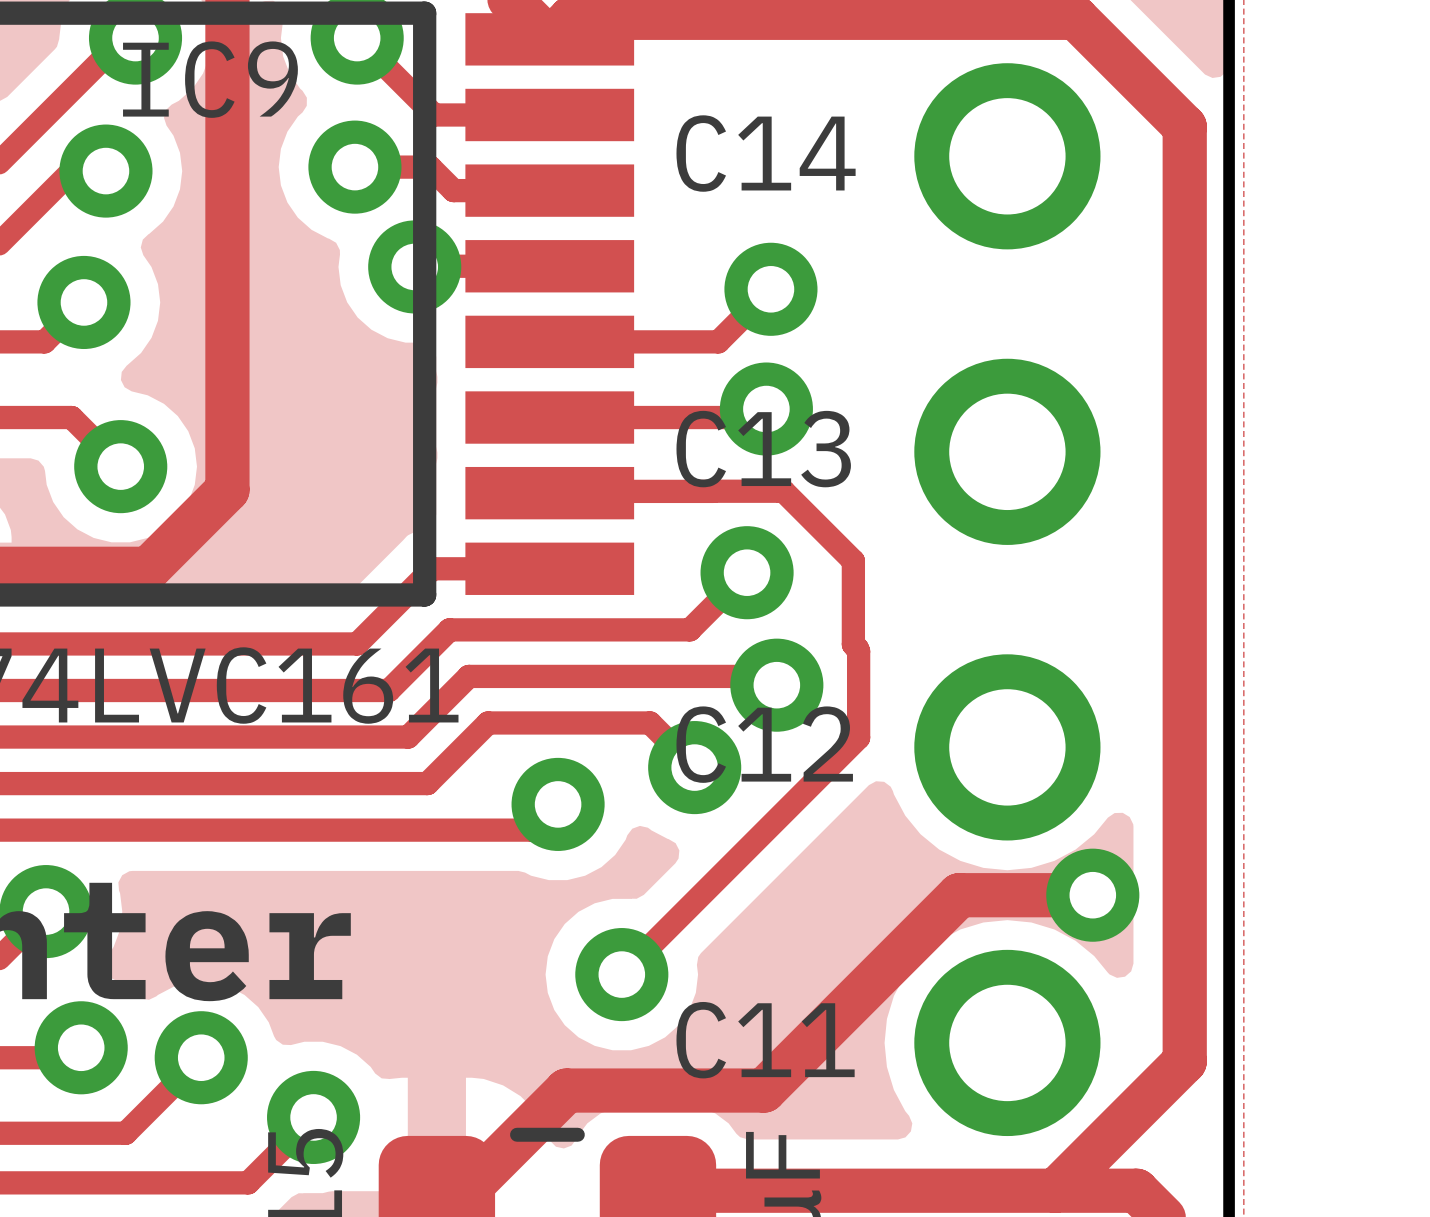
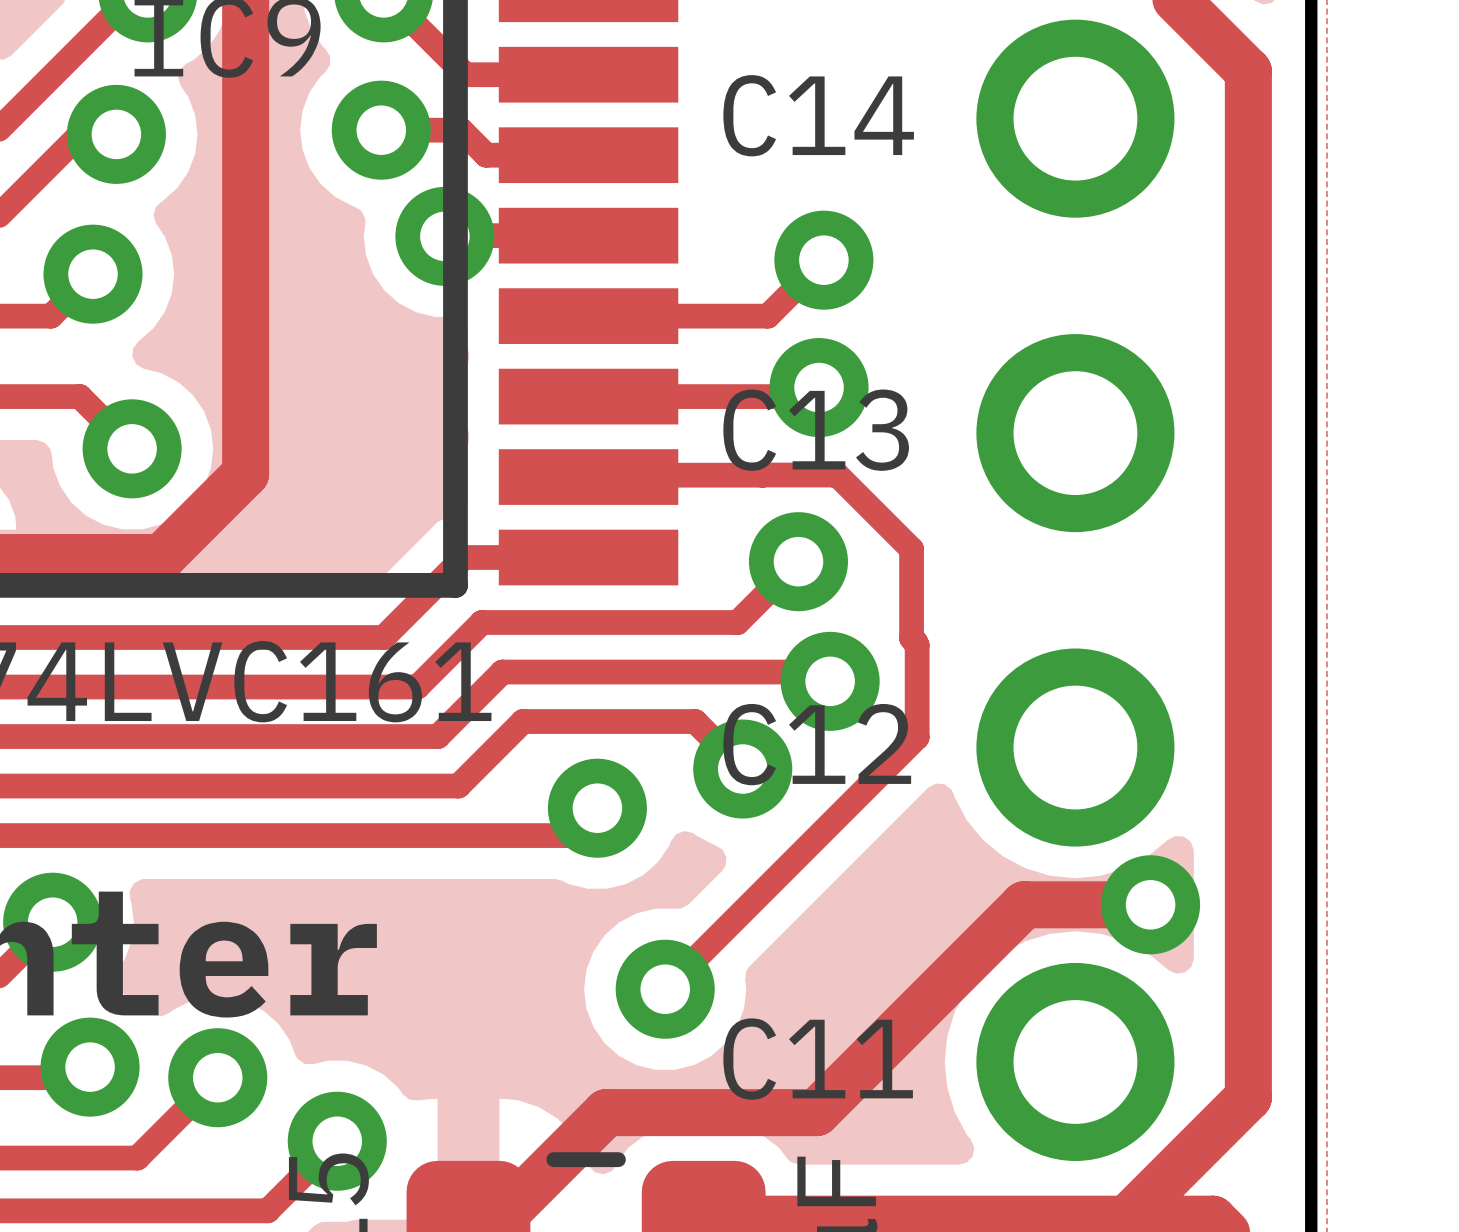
track: (1169, 111) (1184, 126) (1184, 1061) (1169, 1076) -> (1248, 71) (1248, 1097)
via position: (1092, 895) -> (1150, 904)

